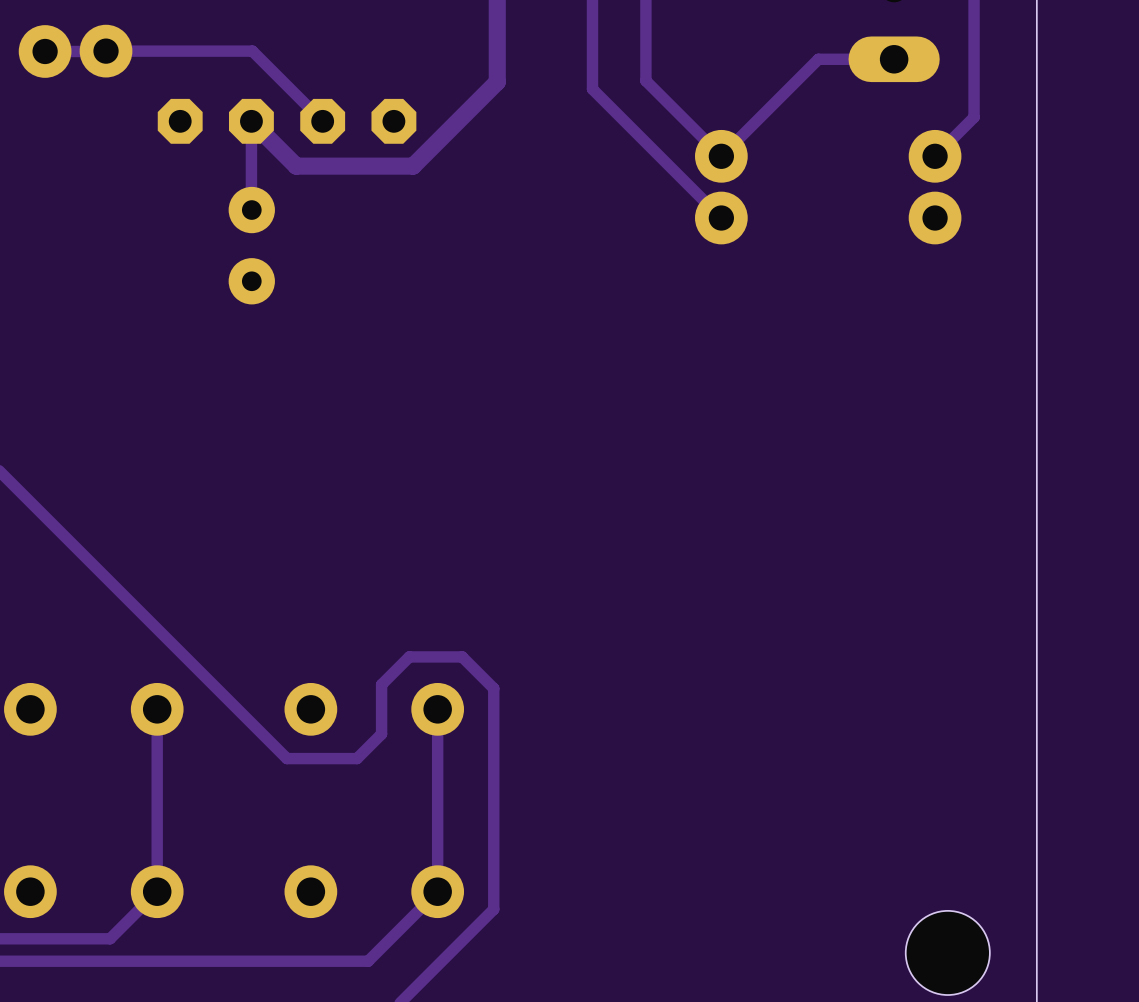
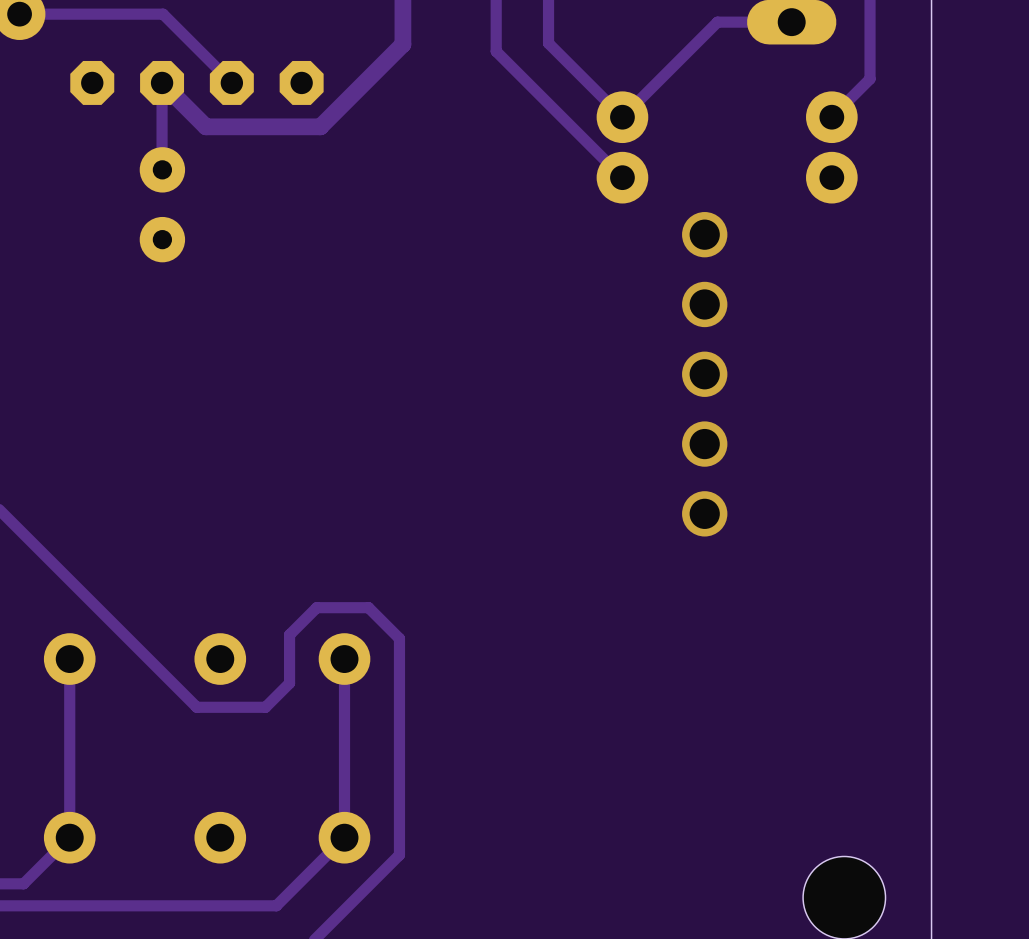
via: none -> (704, 234)
via: none -> (704, 304)
via: none -> (704, 374)
via: none -> (704, 444)
via: none -> (704, 513)

